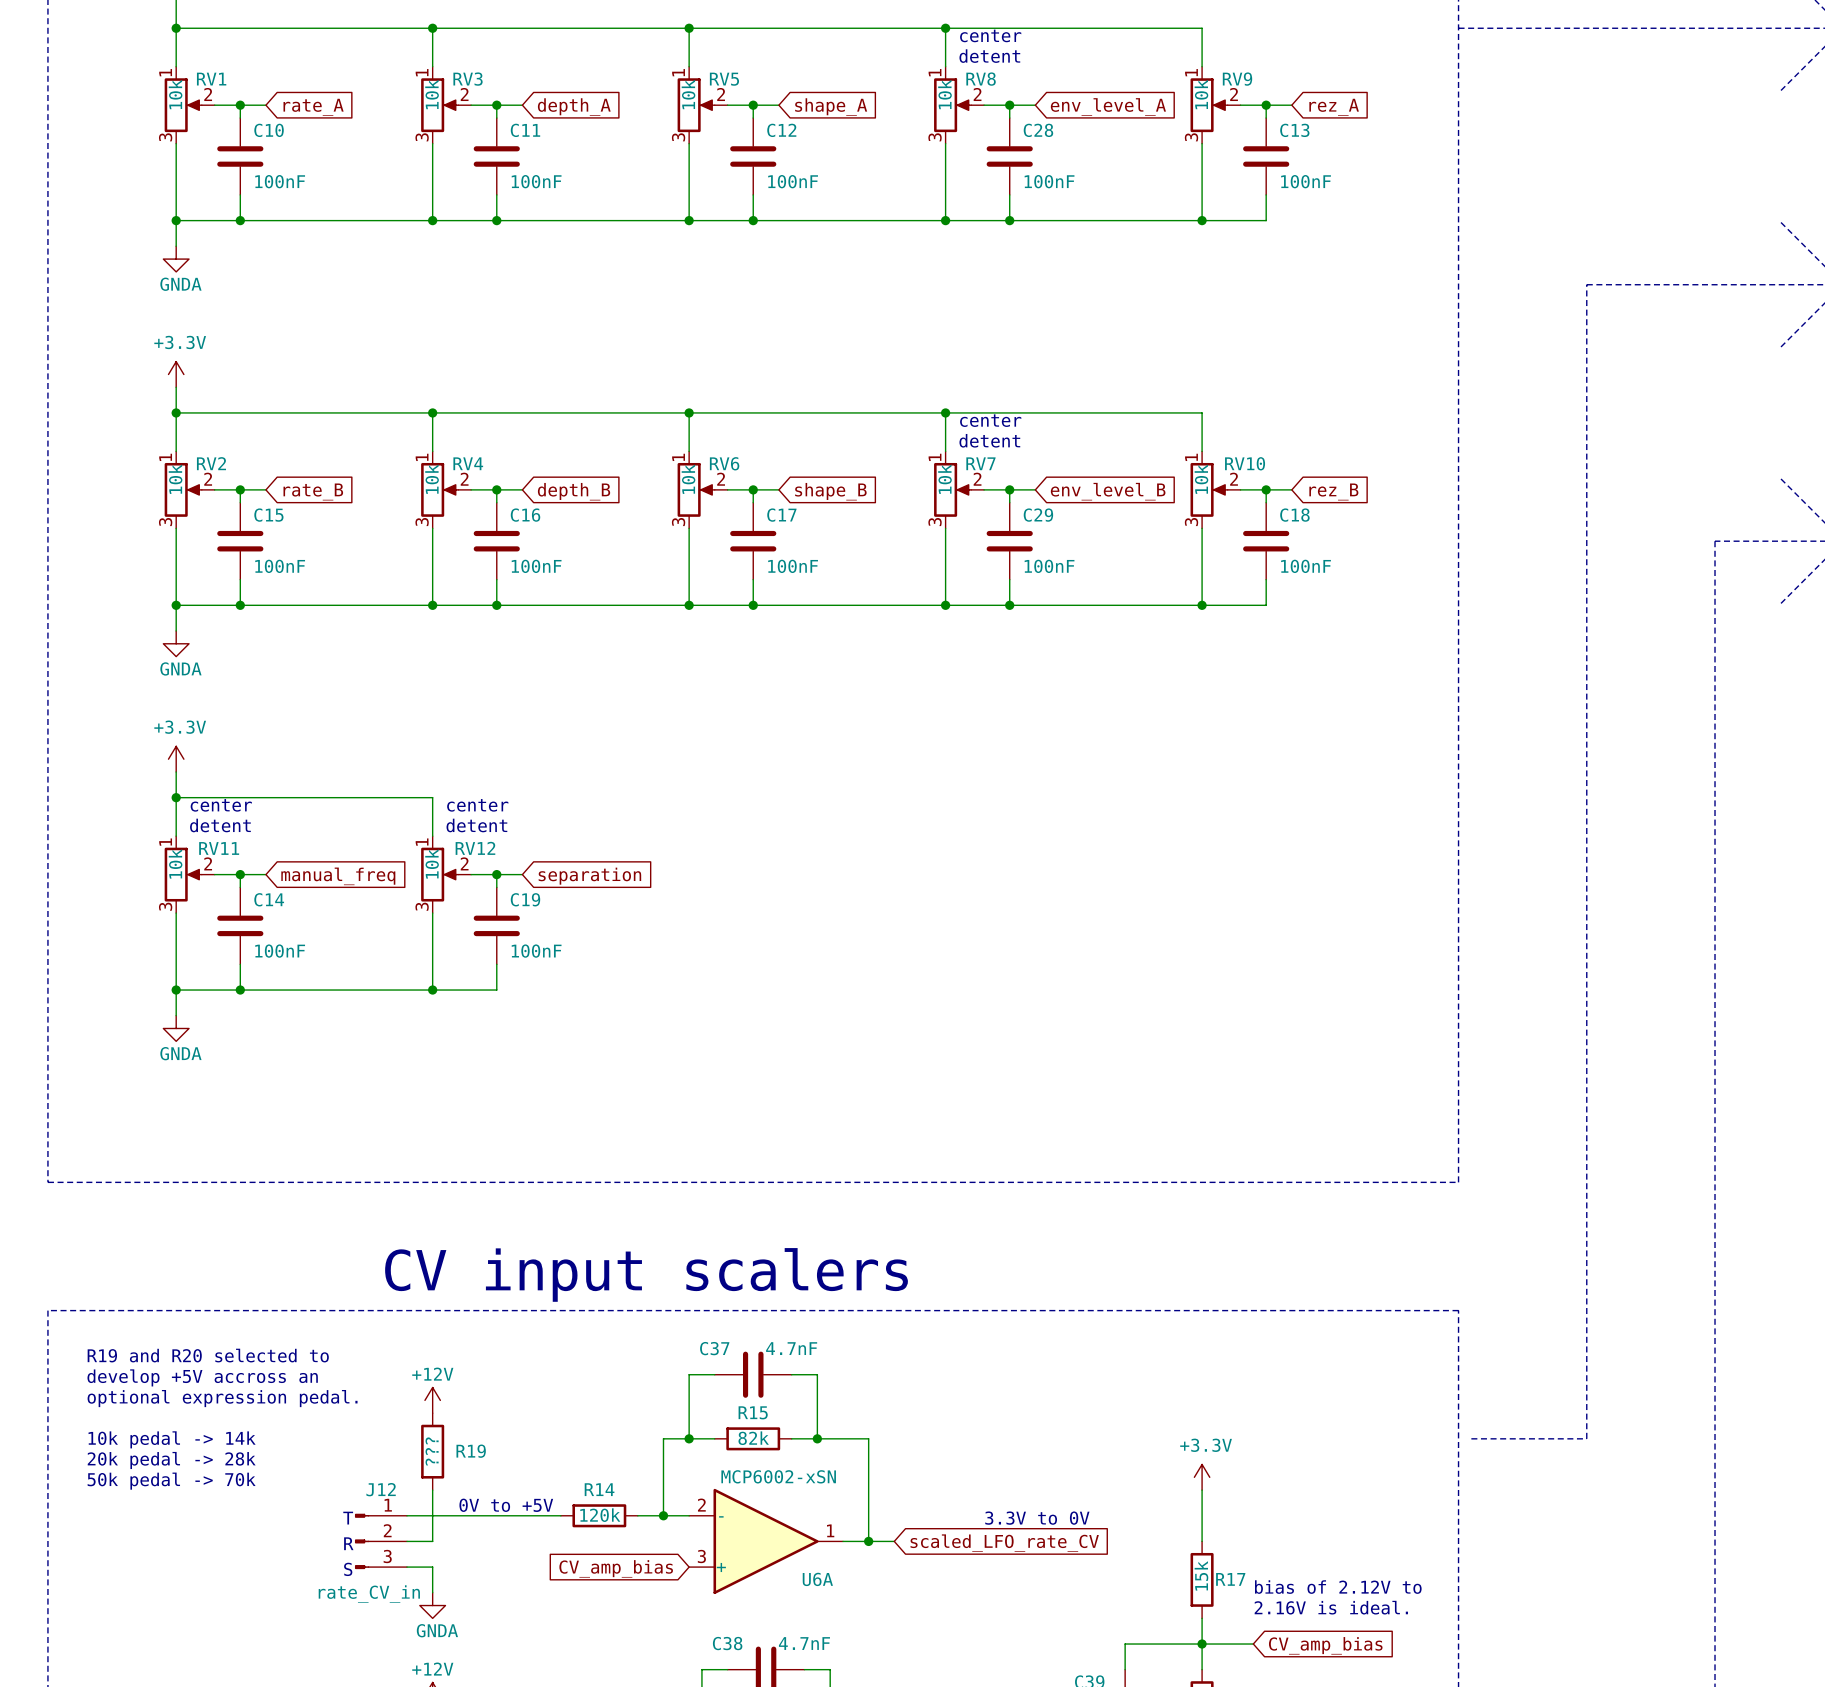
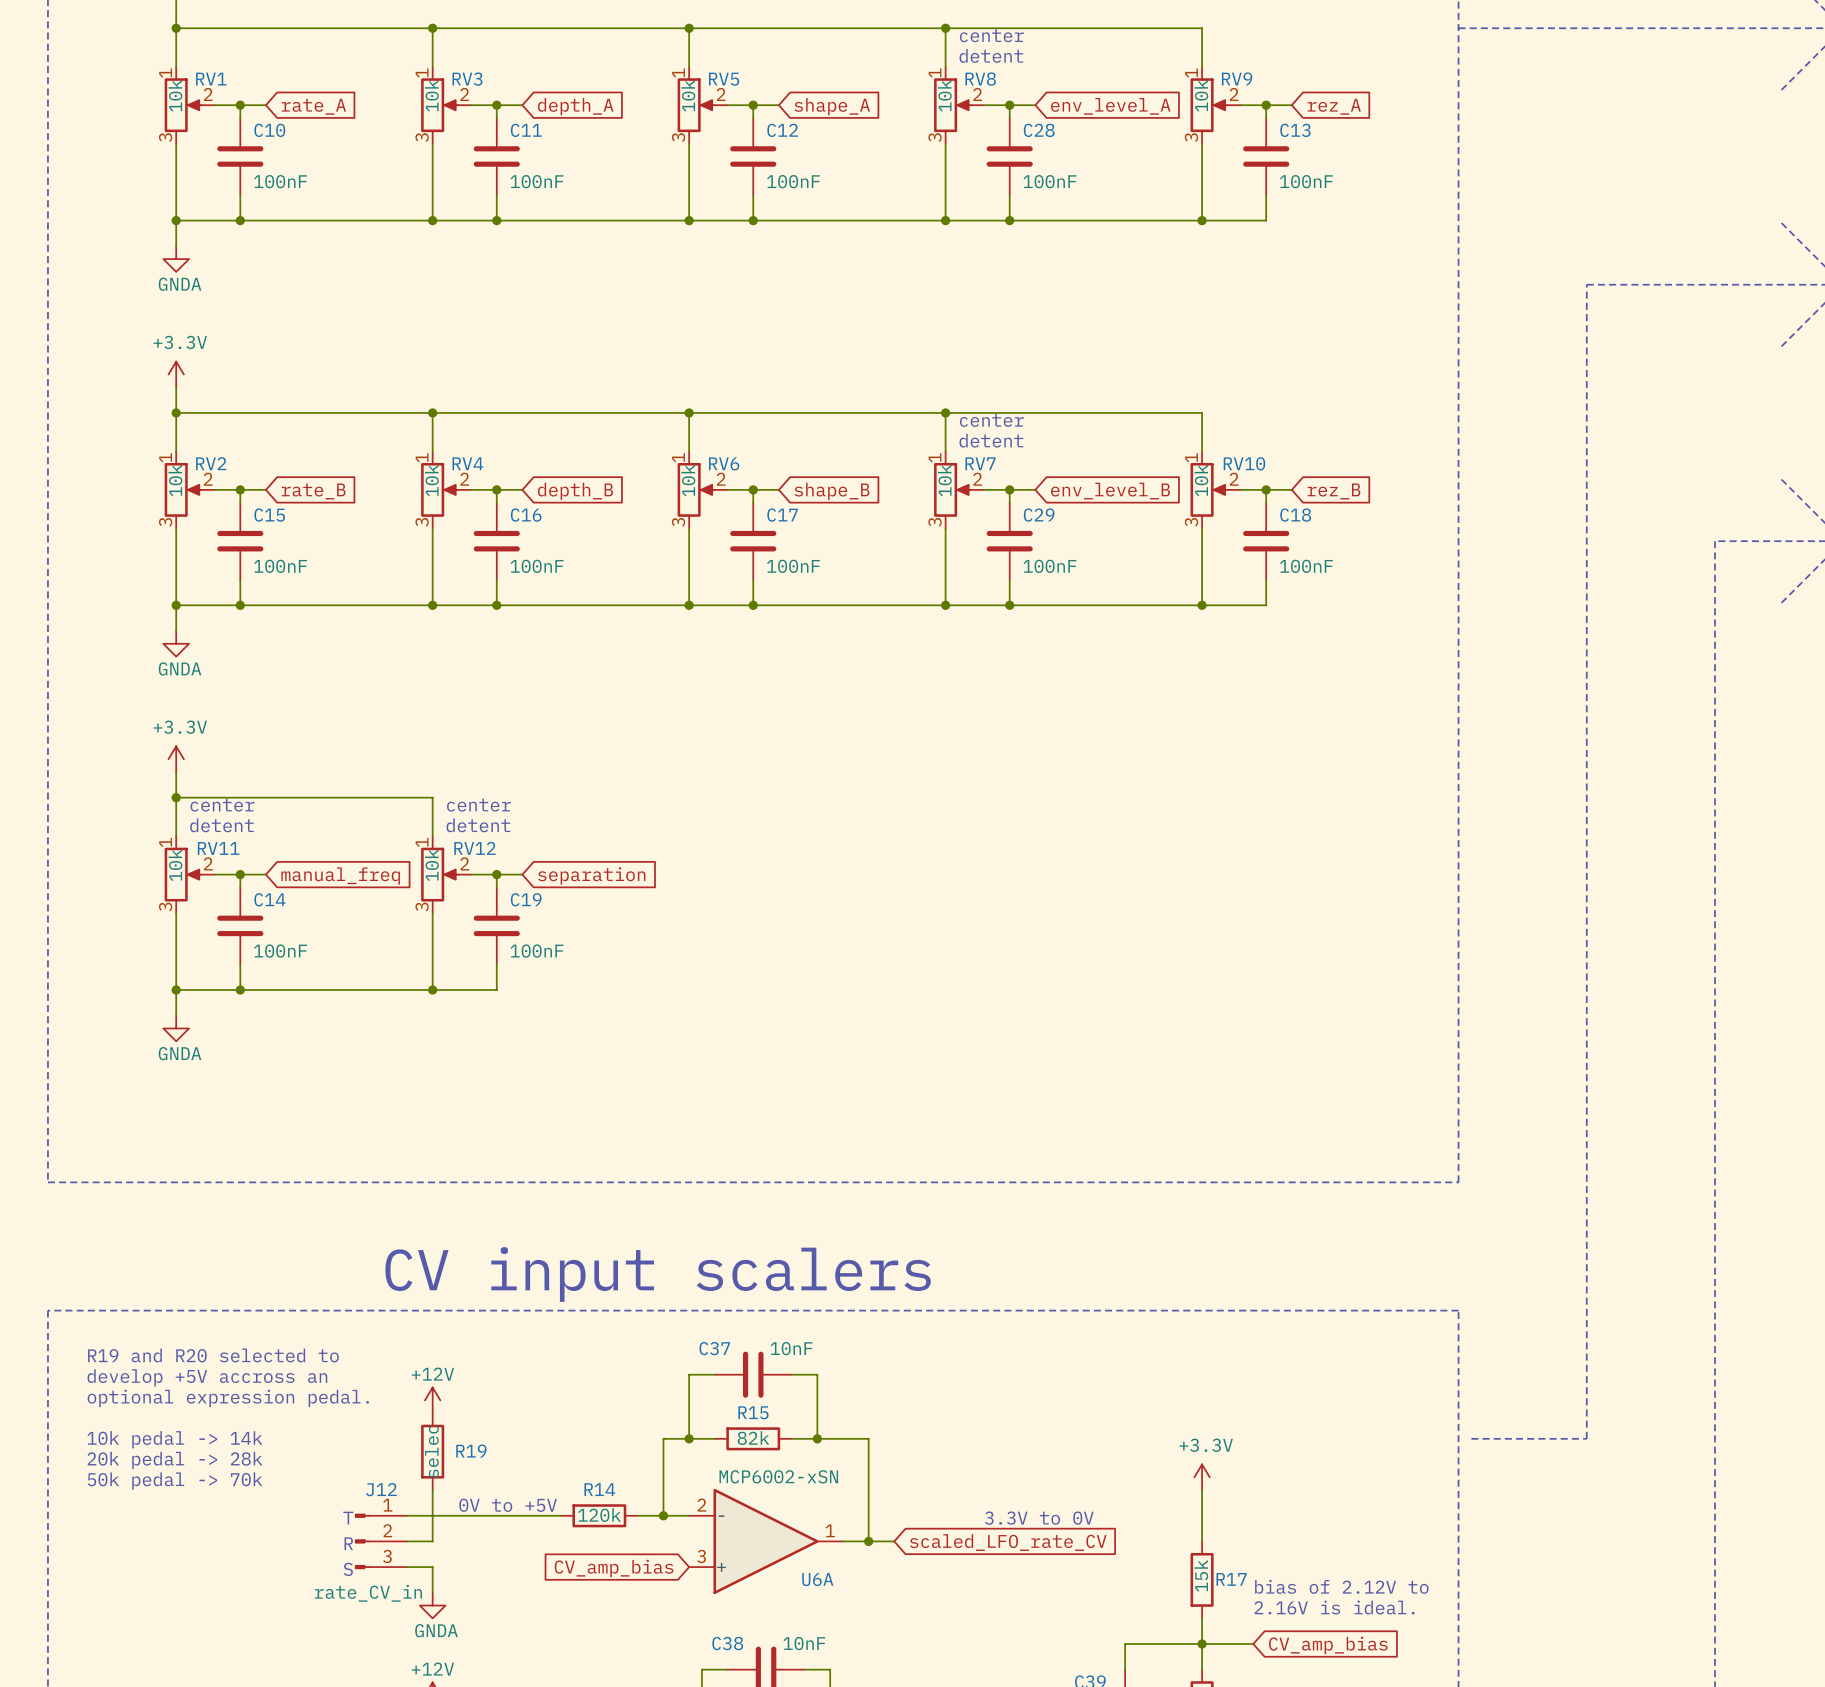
C37 value: 4.7nF (791, 1348) -> 10nF (791, 1348)
R19 value: ??? (432, 1451) -> selec (431, 1451)
C38 value: 4.7nF (804, 1643) -> 10nF (804, 1643)

